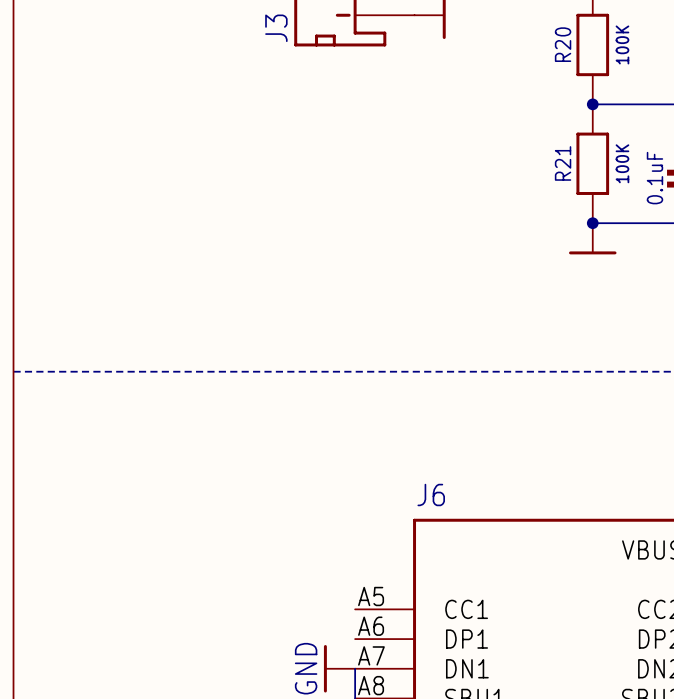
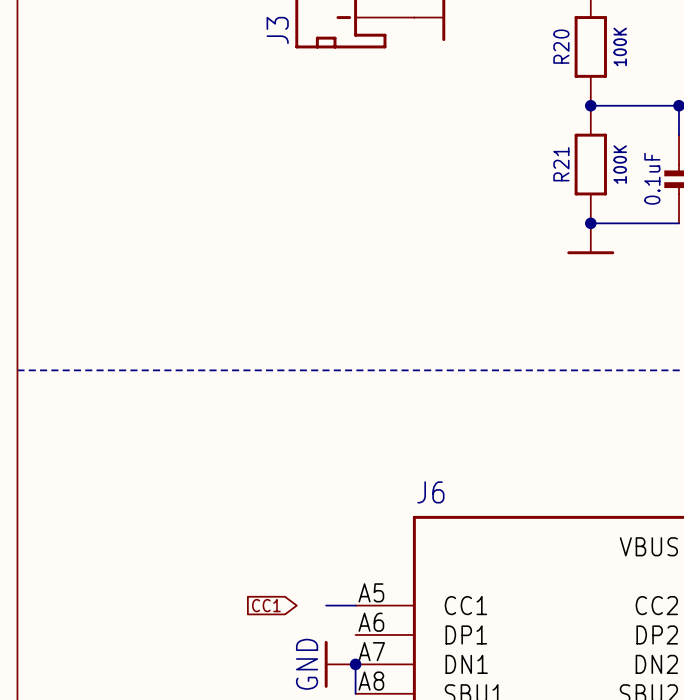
global label: none -> CC1 (266, 605)
wire: none -> (326, 605) (355, 605)
junction: none -> (355, 664)

